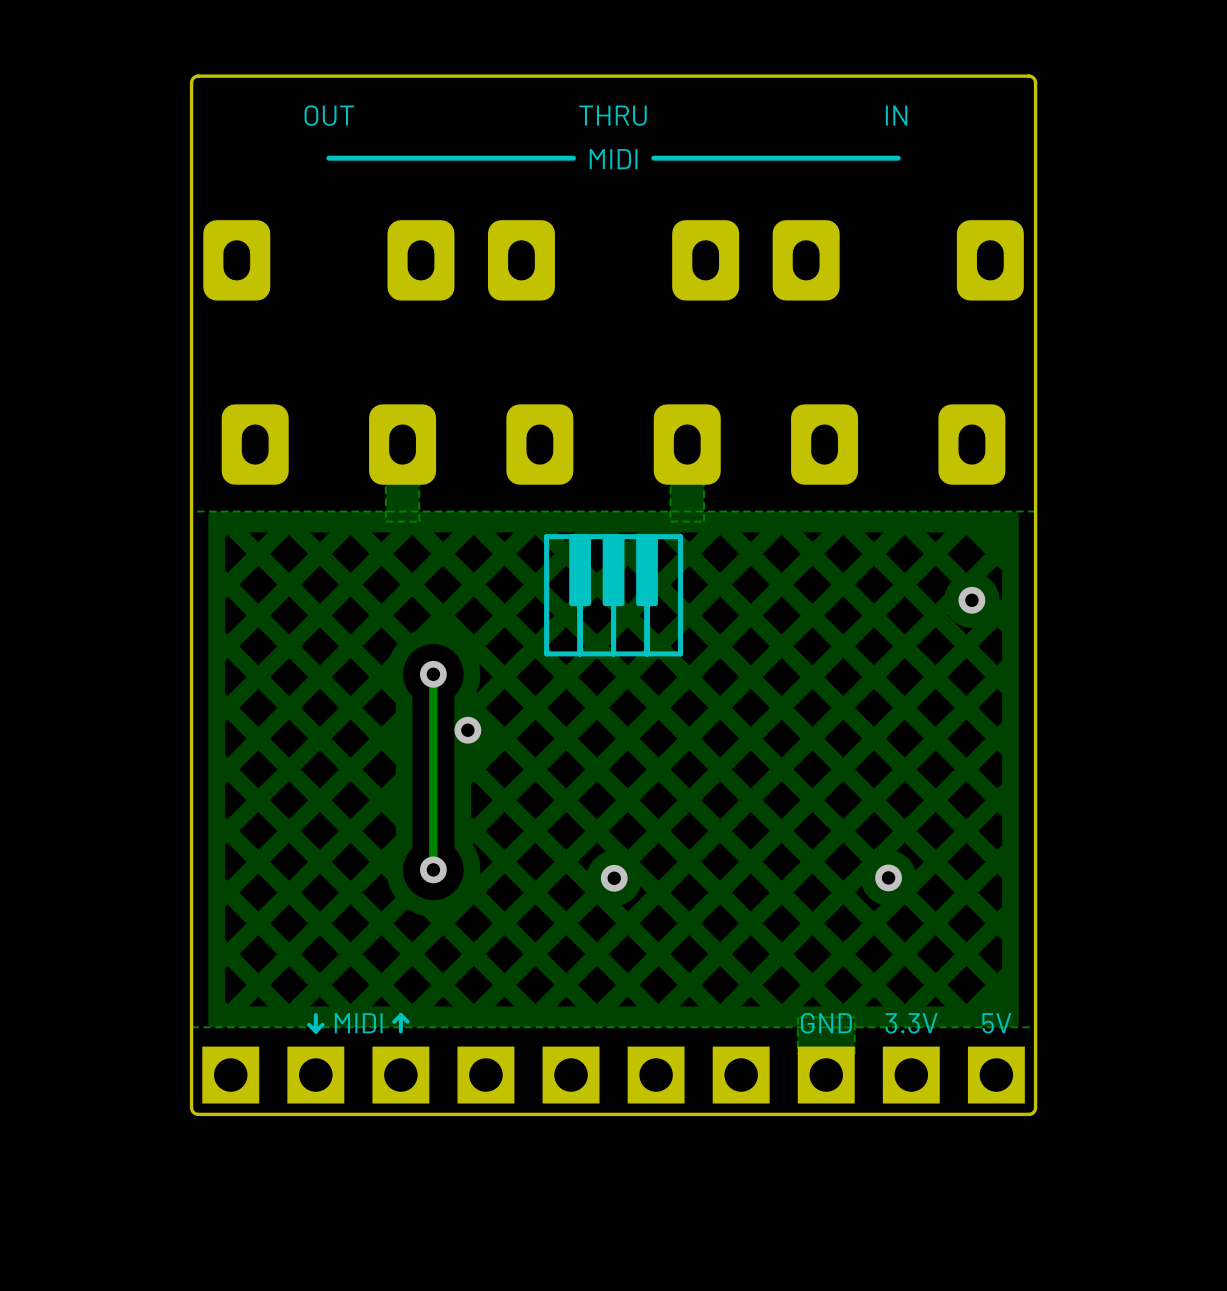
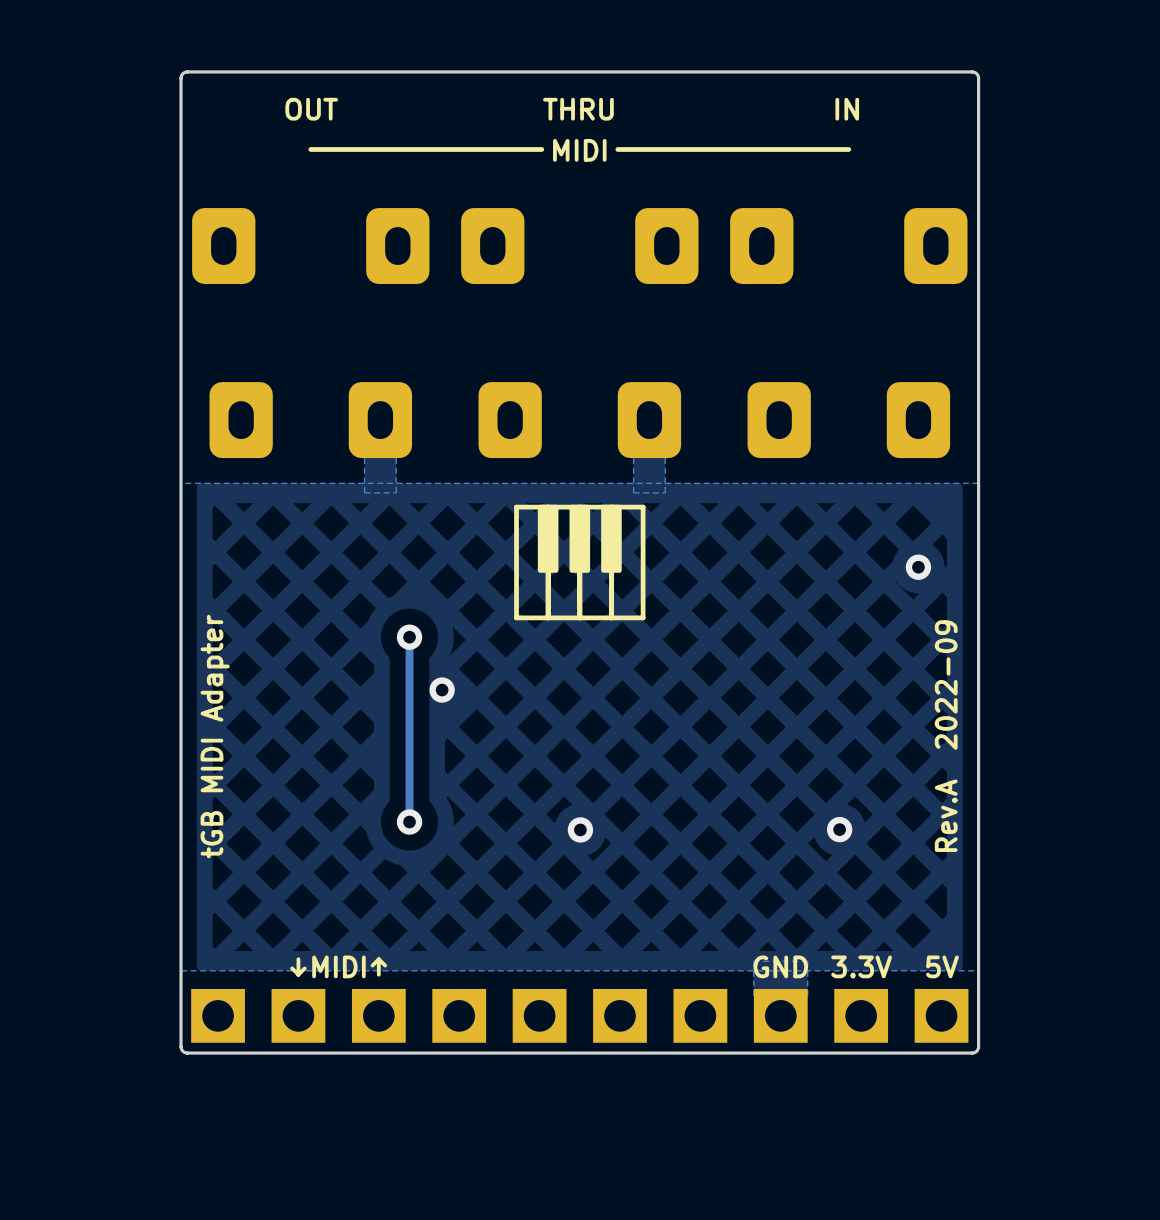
text: none -> tGB MIDI Adapter (215, 736)
text: none -> Rev.A 2022-09 (946, 736)

